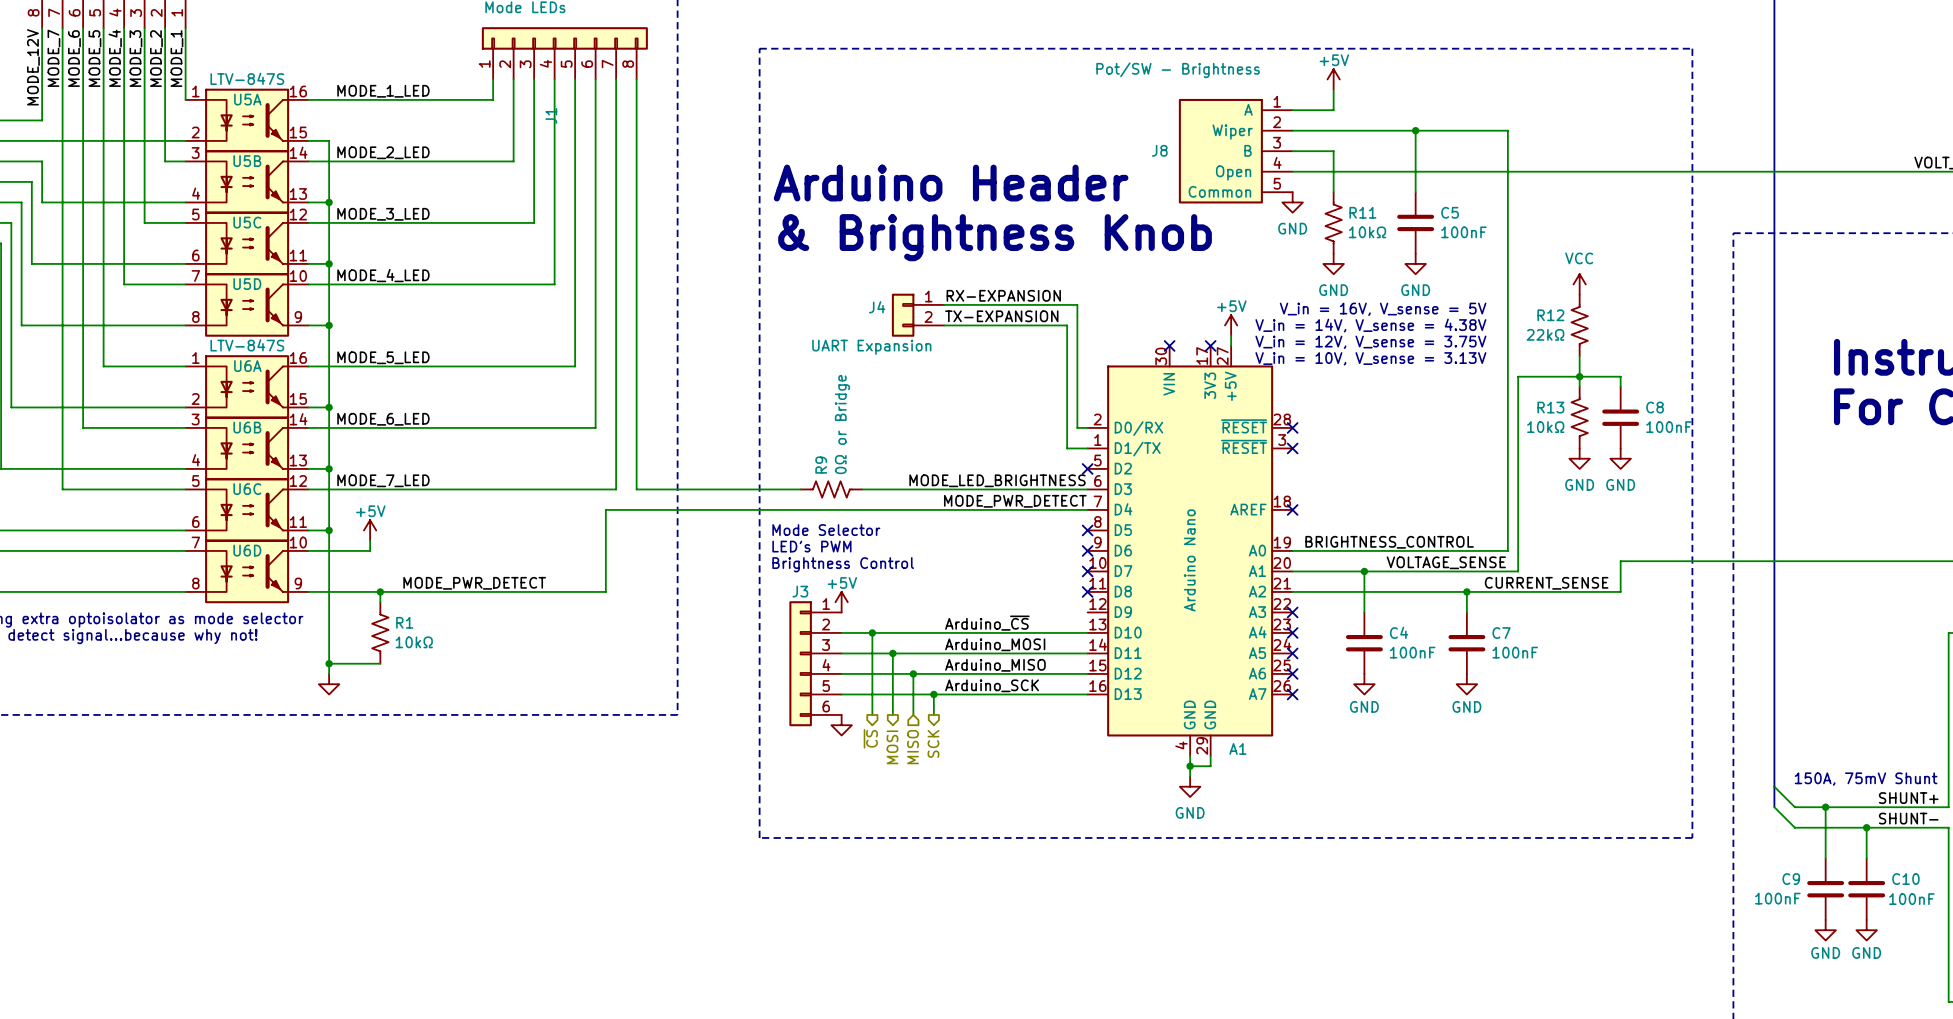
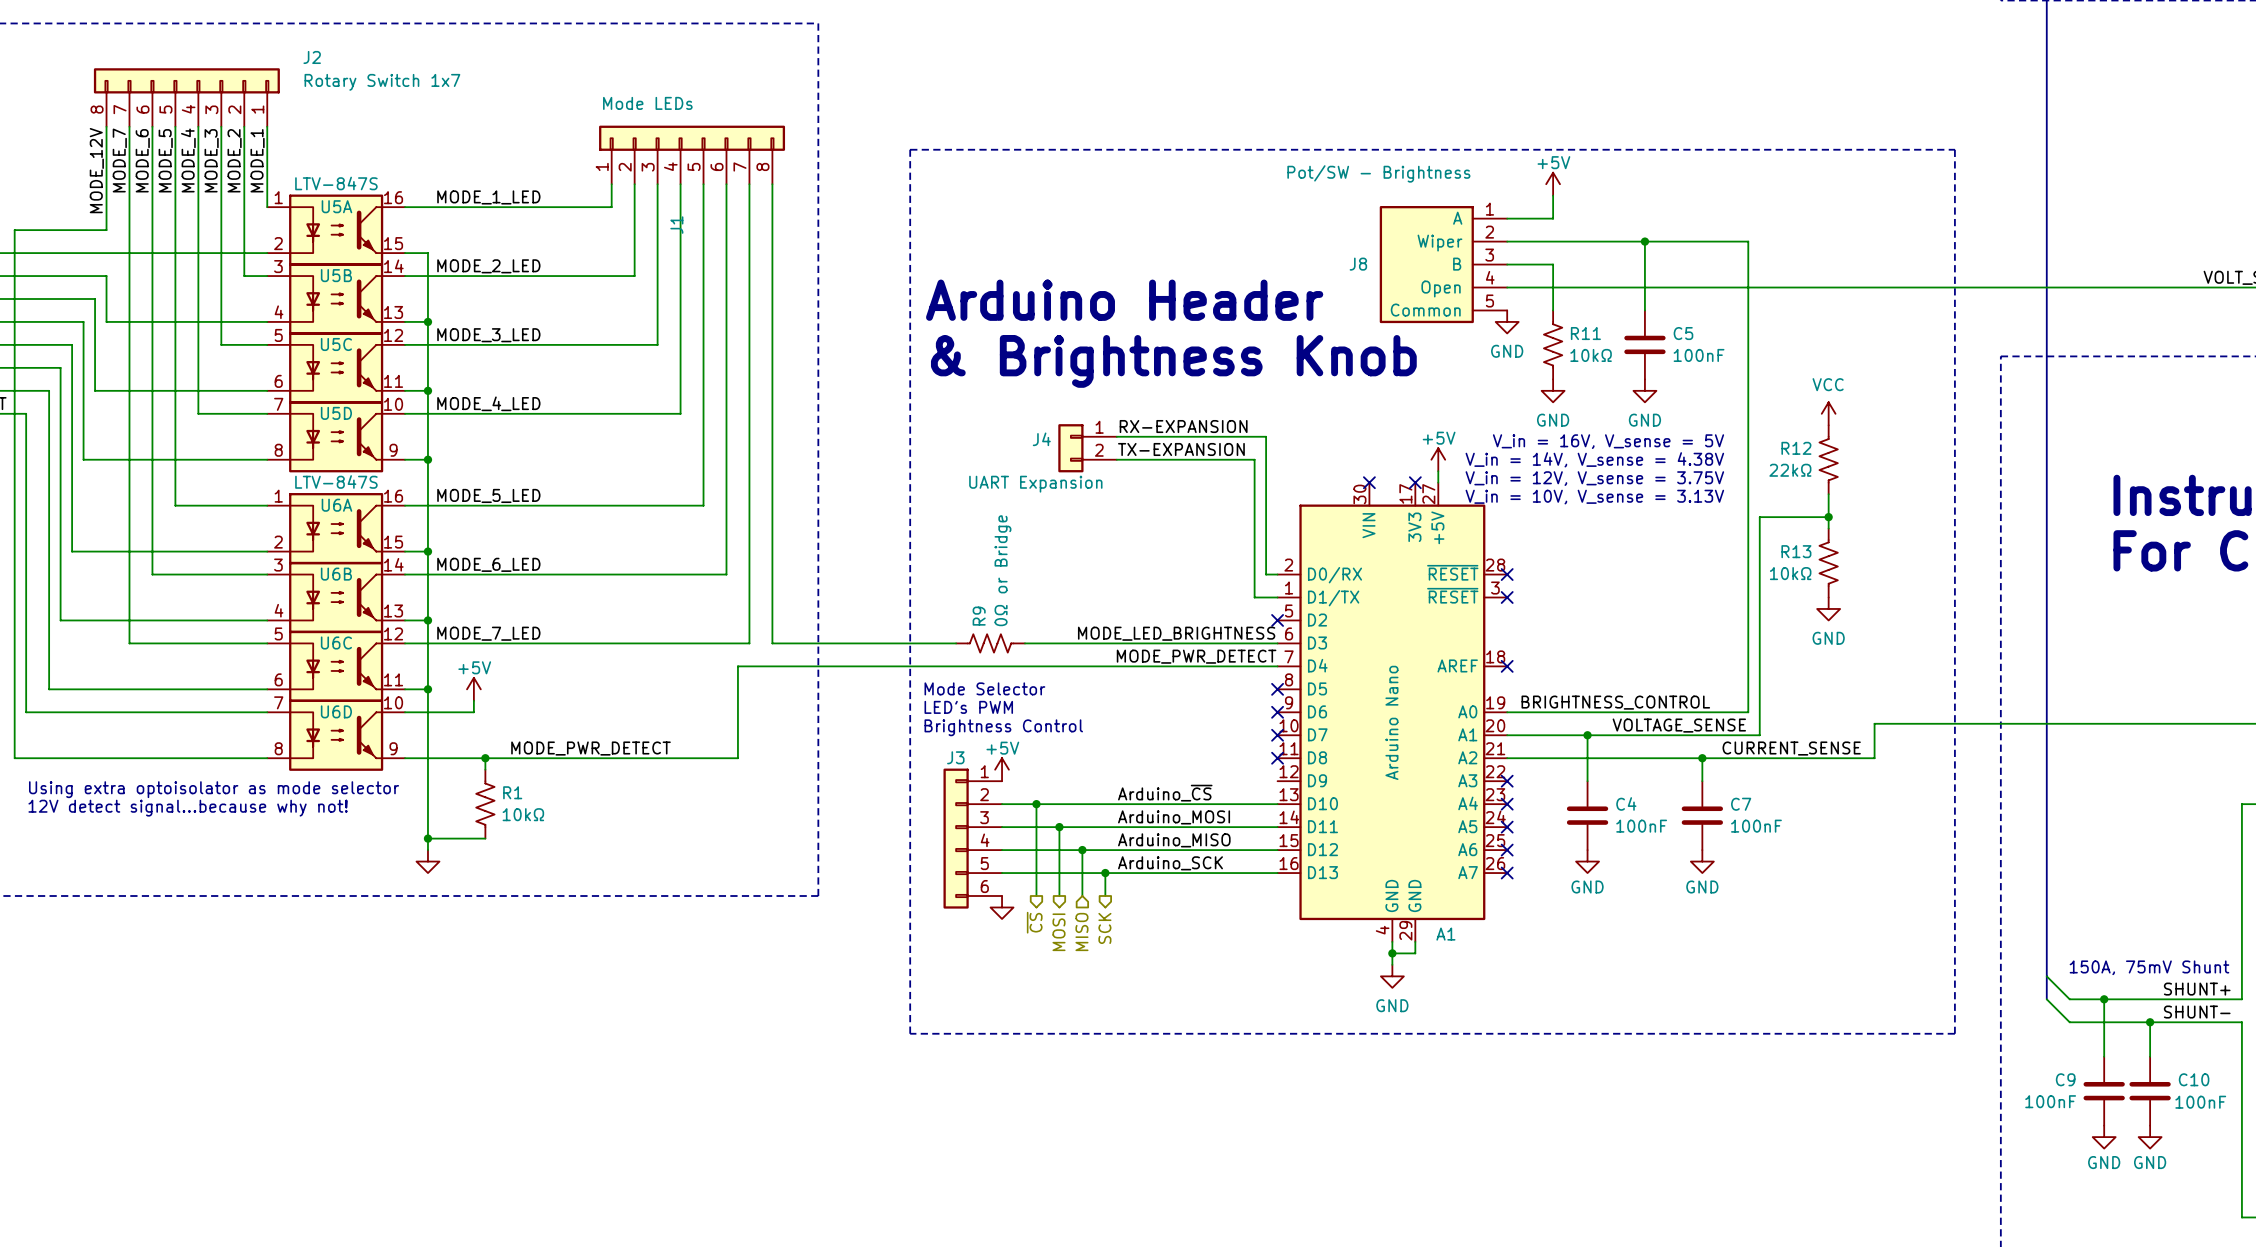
wire: (1579, 376) (1620, 376) (1620, 386) -> none
C8: 100nF (1620, 417) -> none
power symbol: GND (1620, 458) -> none

